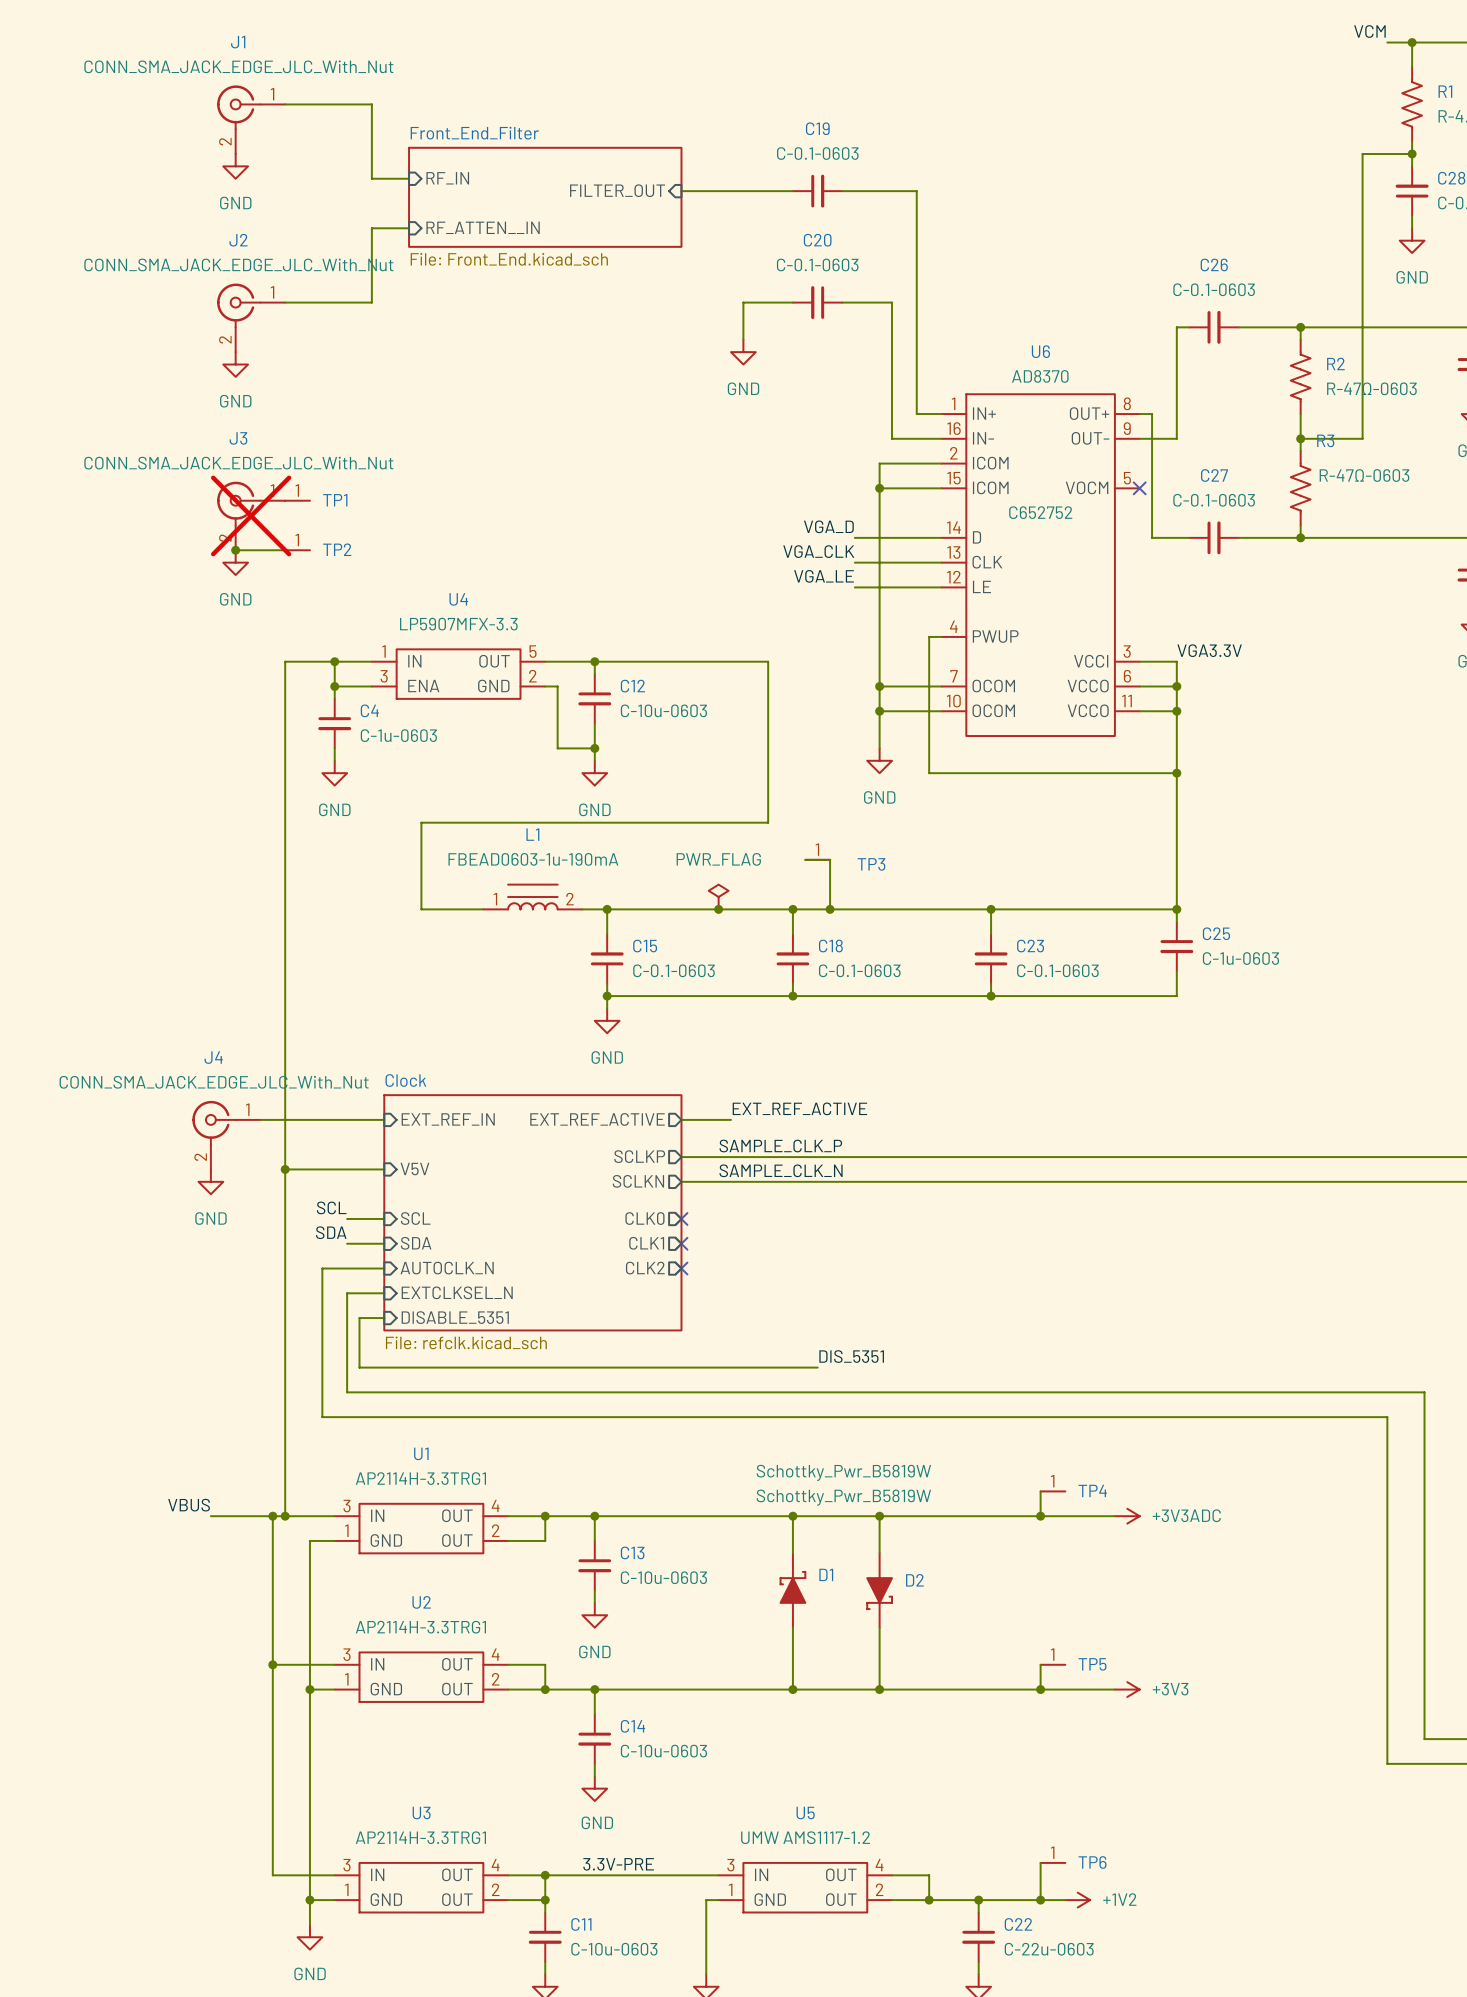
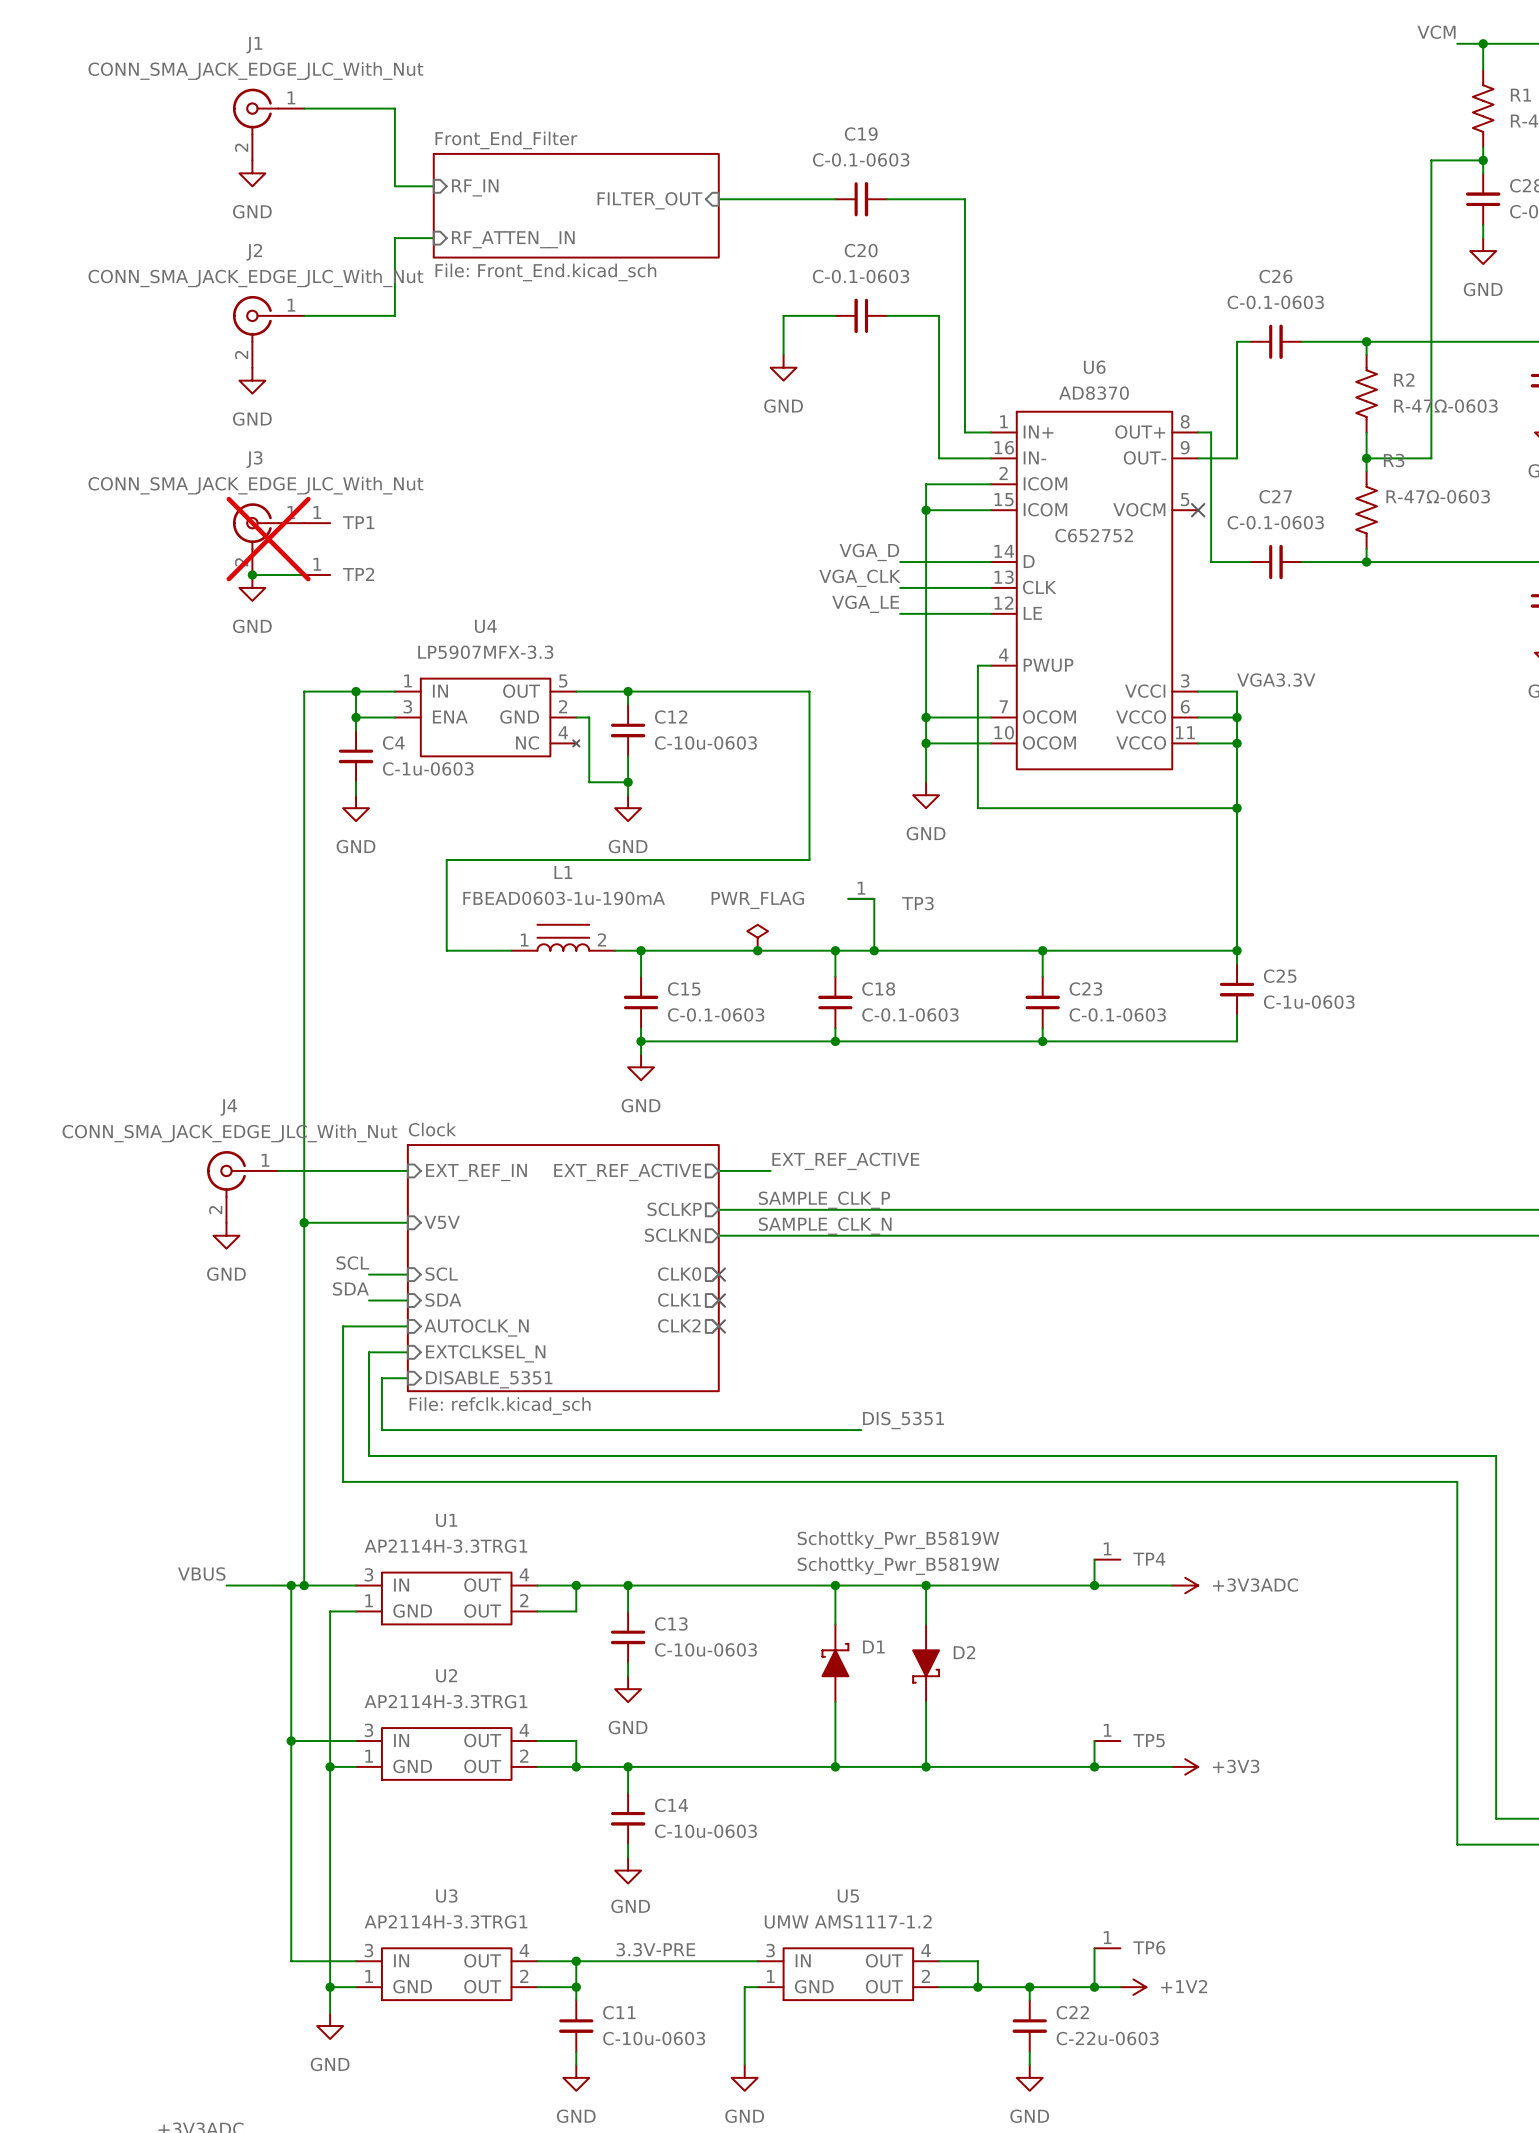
U4 symbol: [371, 649, 546, 699] -> [394, 678, 580, 757]

